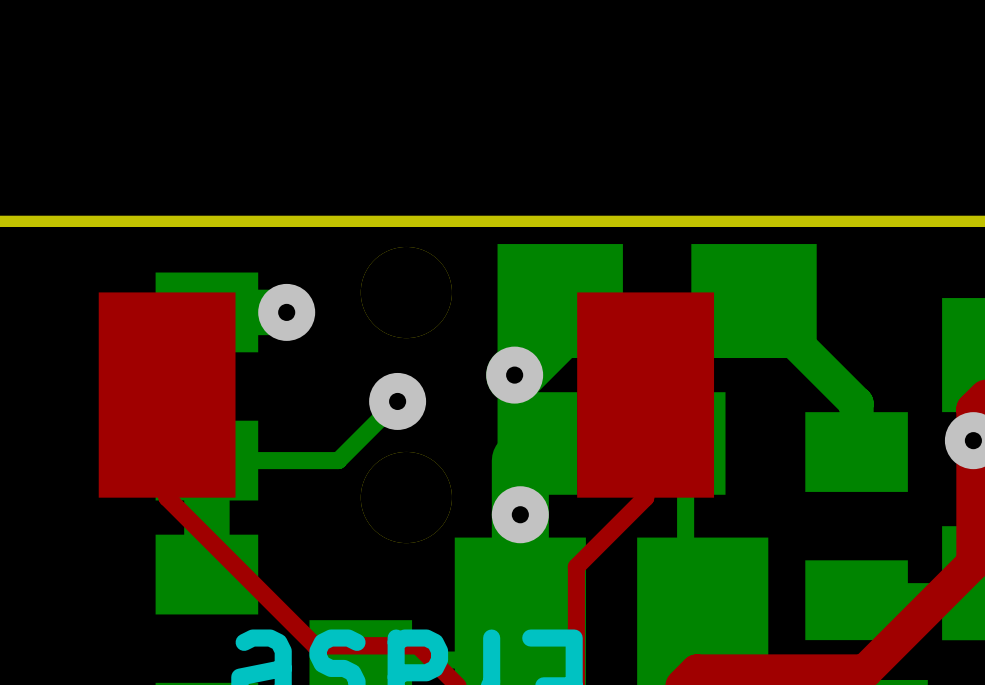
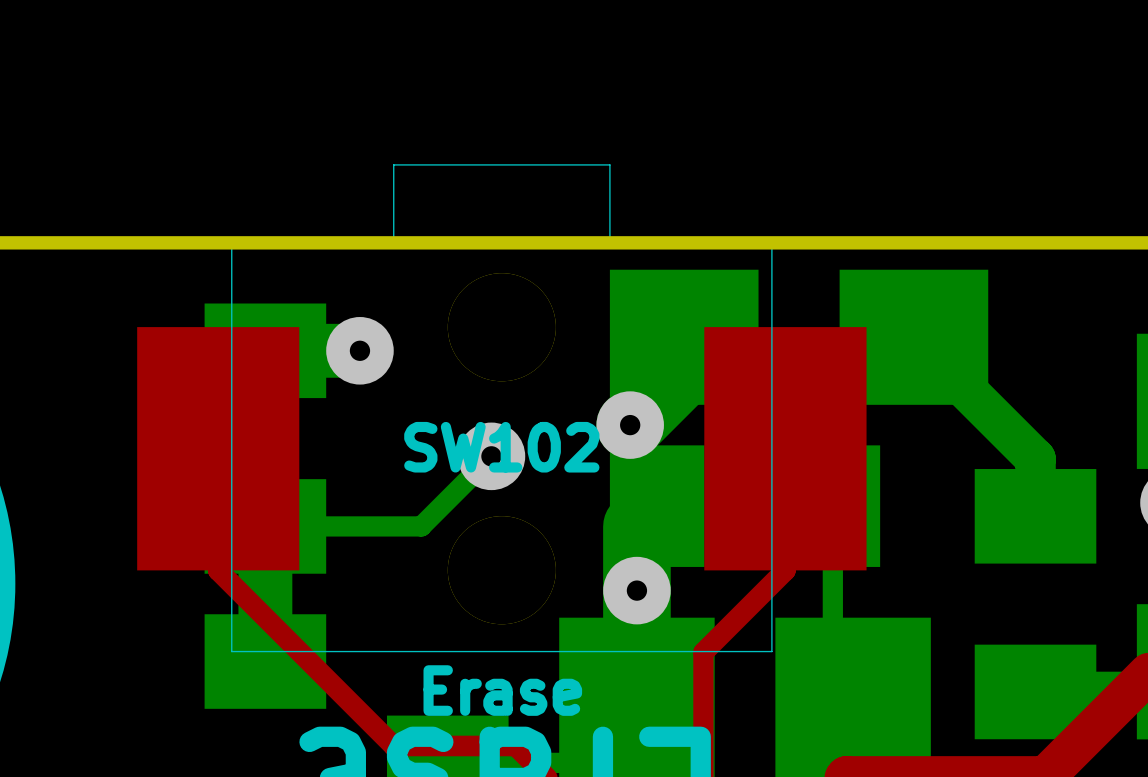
SW102: none -> Erase (501, 408)
part: (406, 395) -> none

